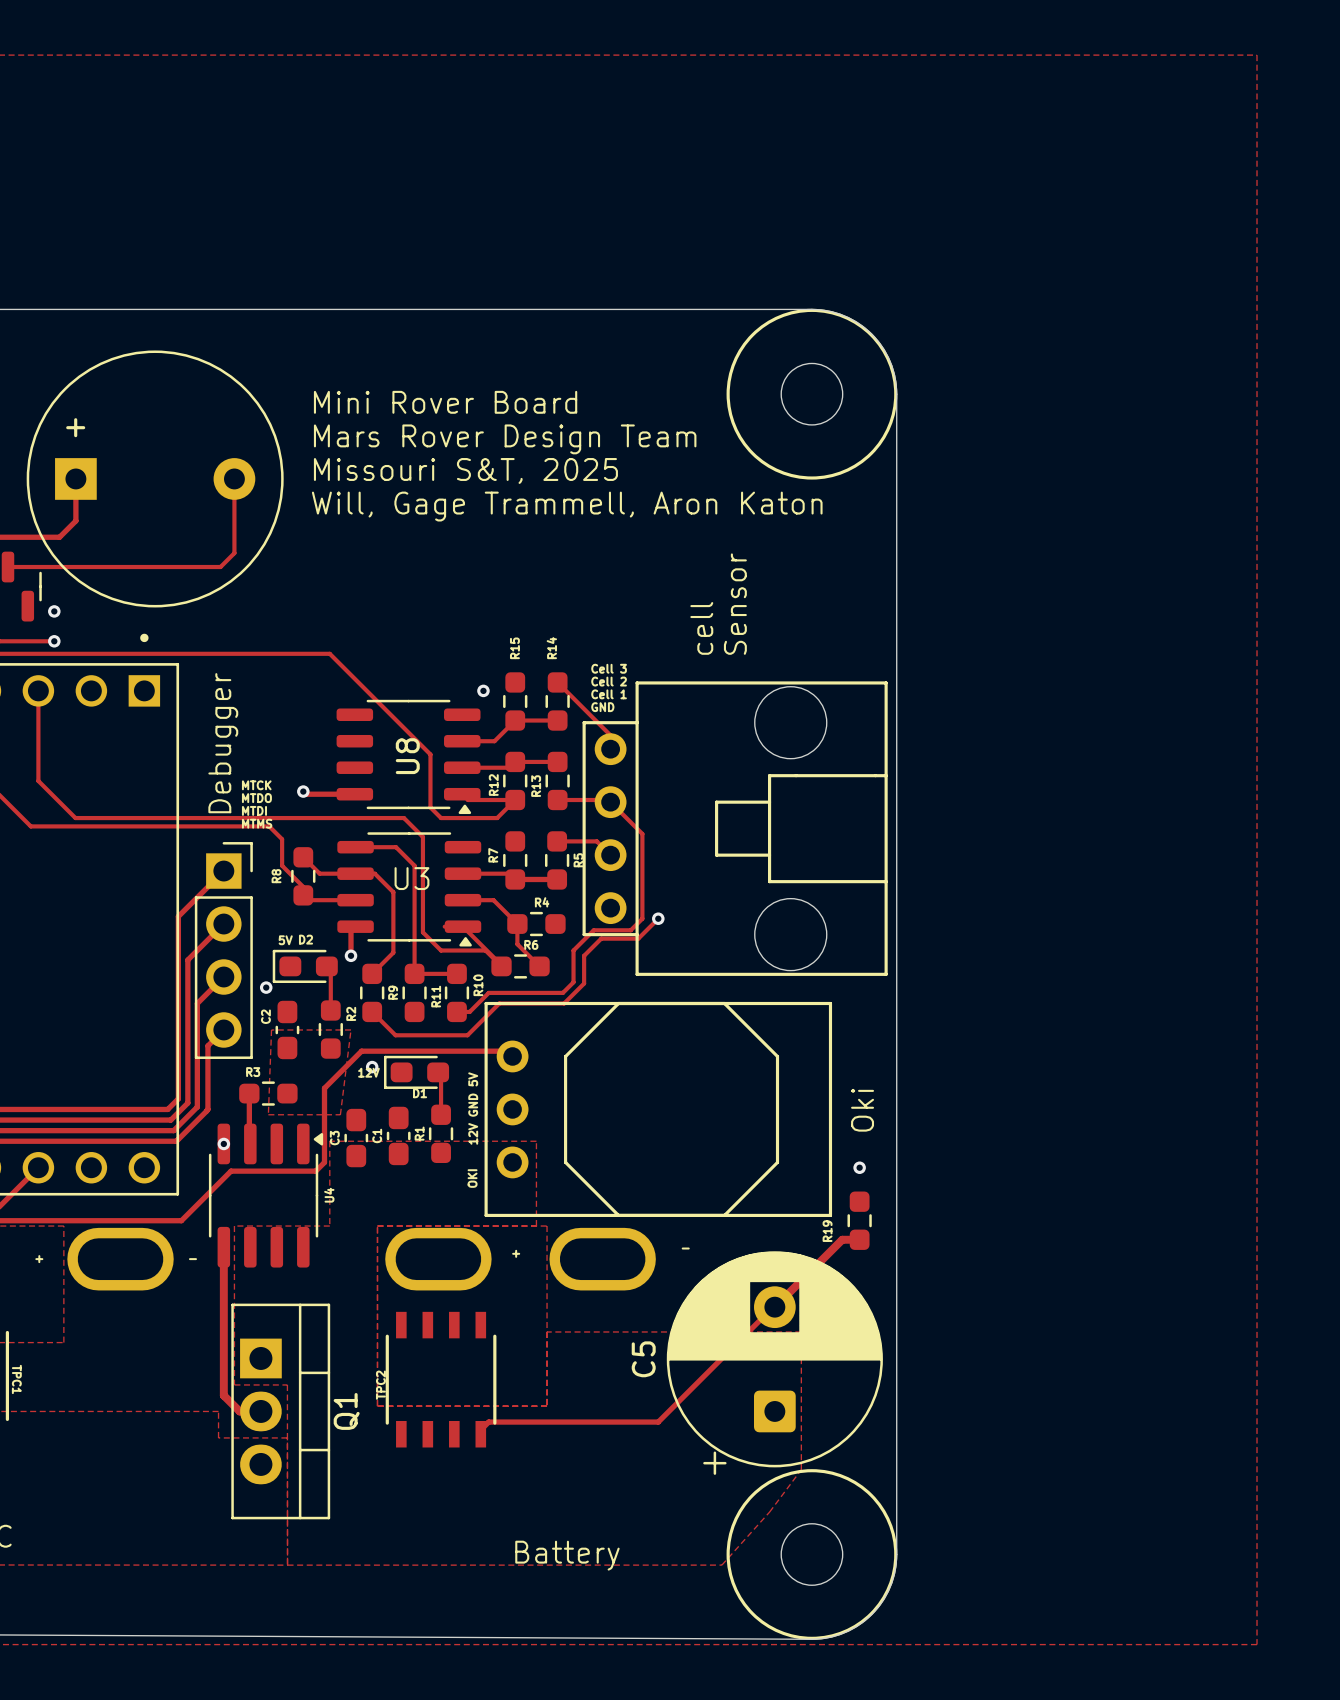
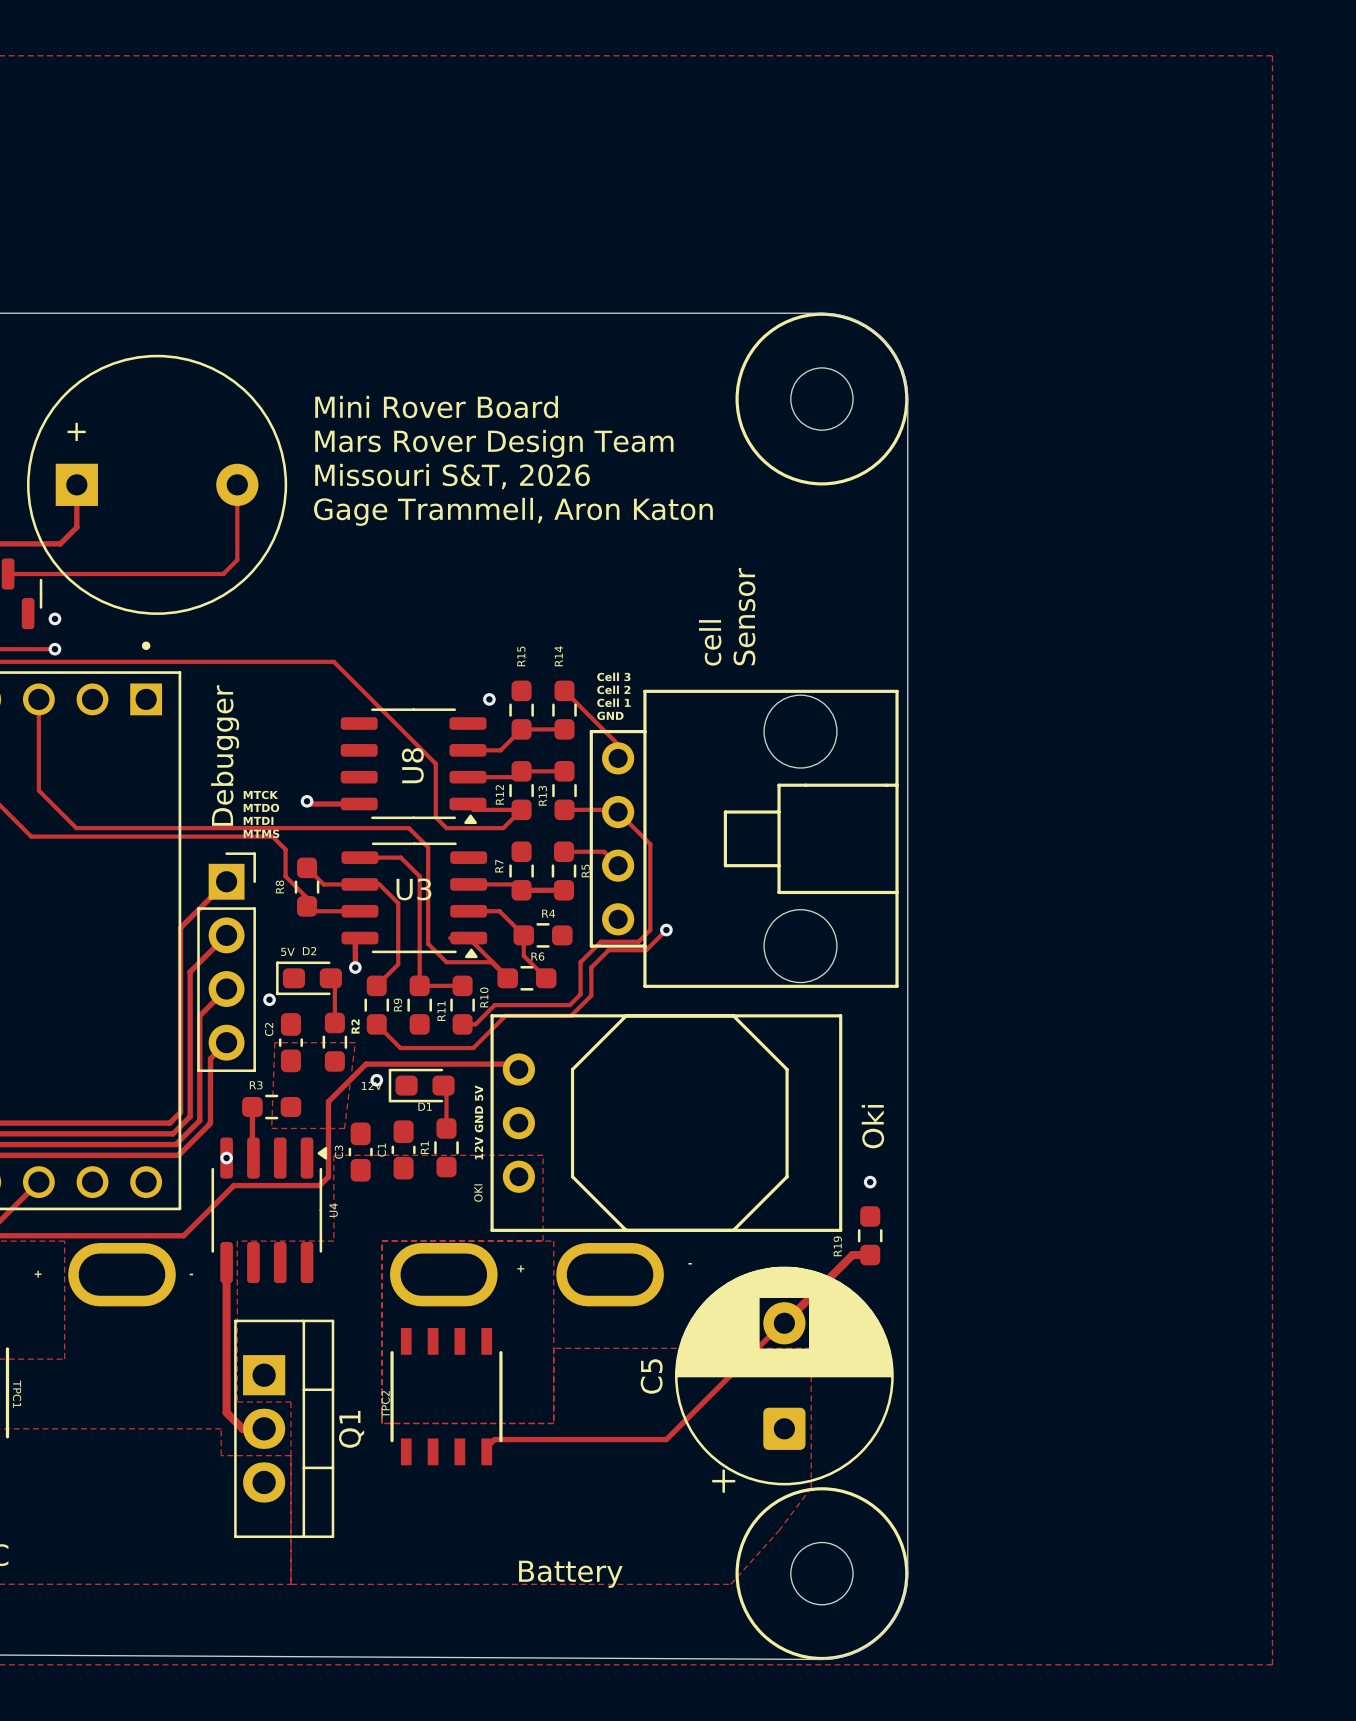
text: Missouri S&T, 2025 (465, 470) -> Missouri S&T, 2026 (452, 476)
text: Will, Gage Trammell, Aron Katon (567, 506) -> Gage Trammell, Aron Katon (513, 511)

